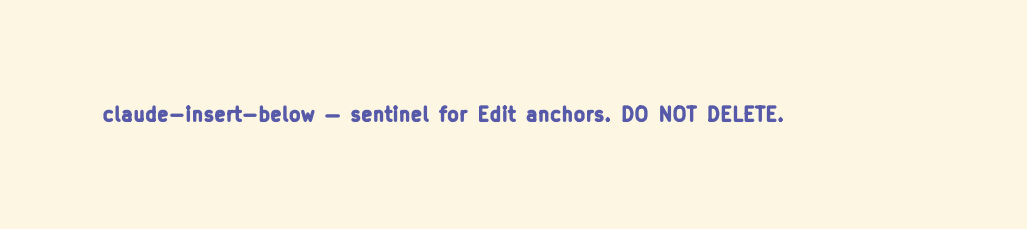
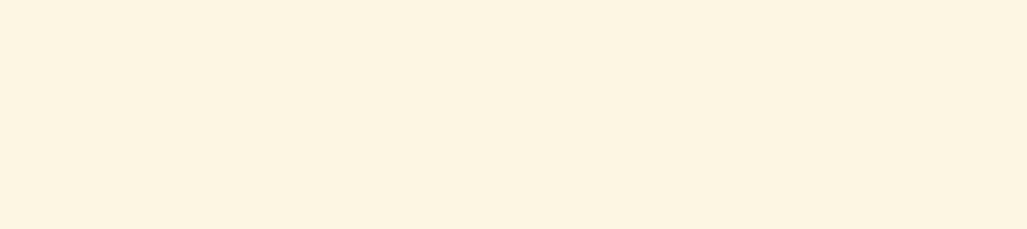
text: claude-insert-below — sentinel for Edit anchors. DO NOT DELETE. (443, 113) -> none

